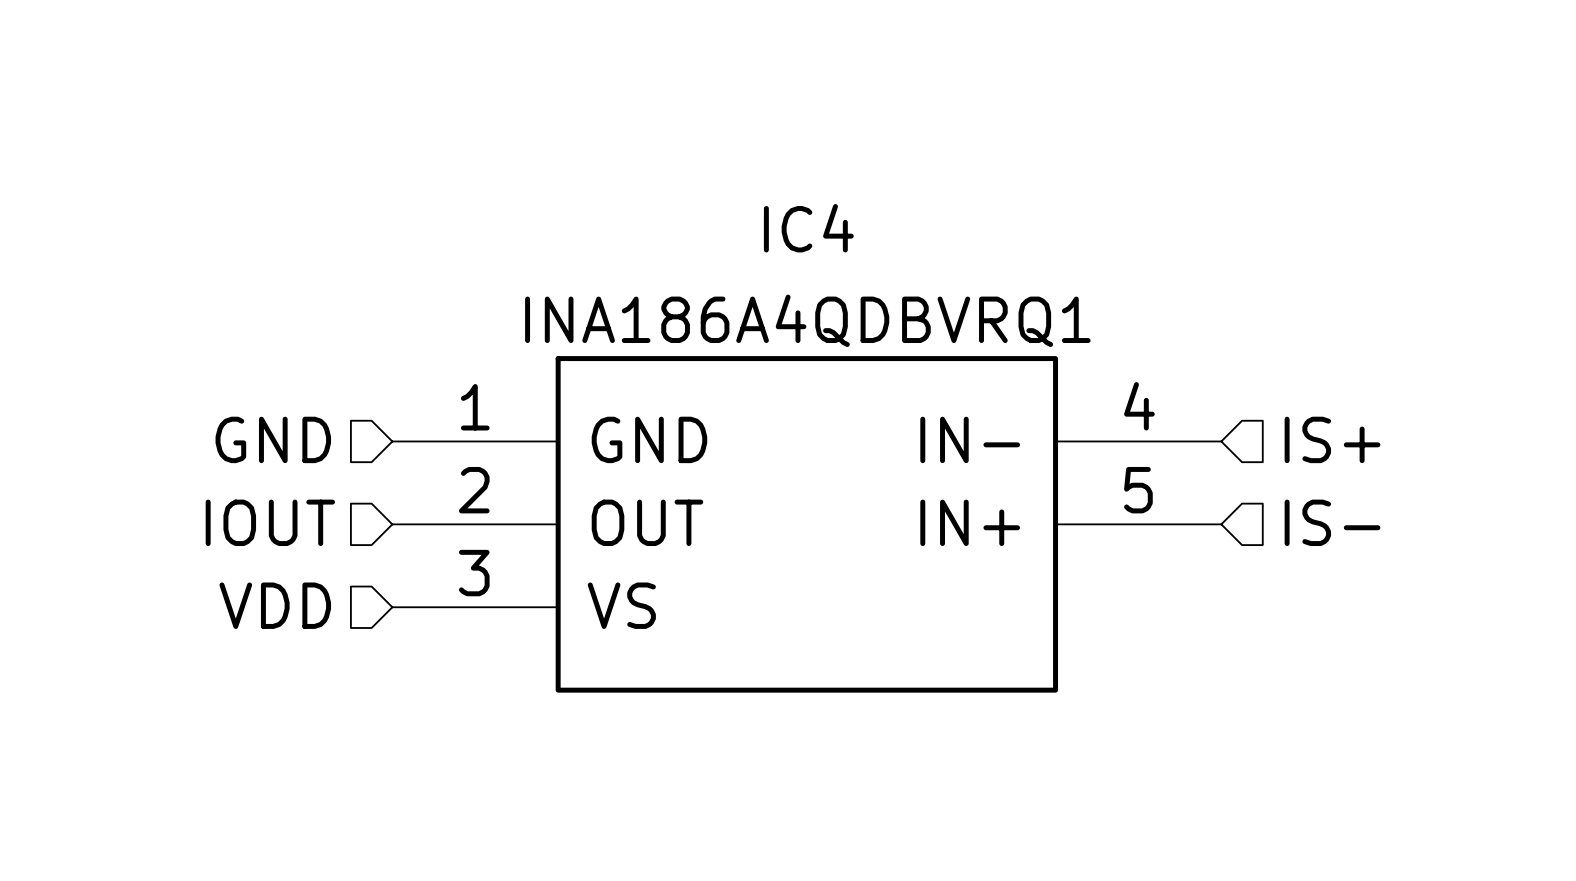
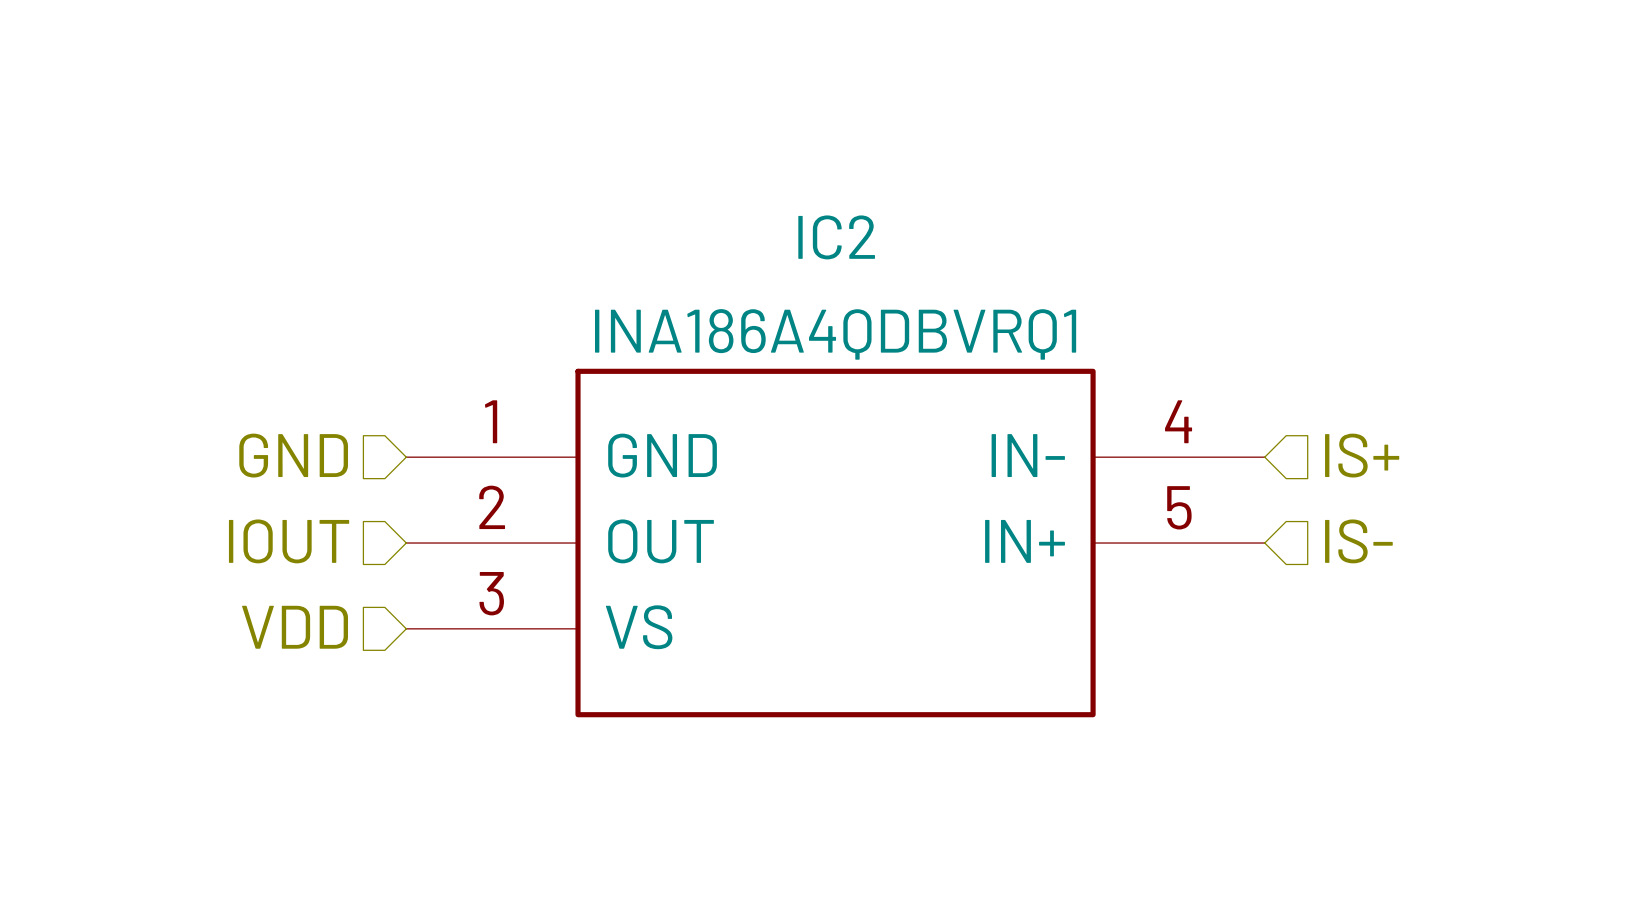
IC4 name: IC4 (808, 228) -> IC2 (836, 237)

